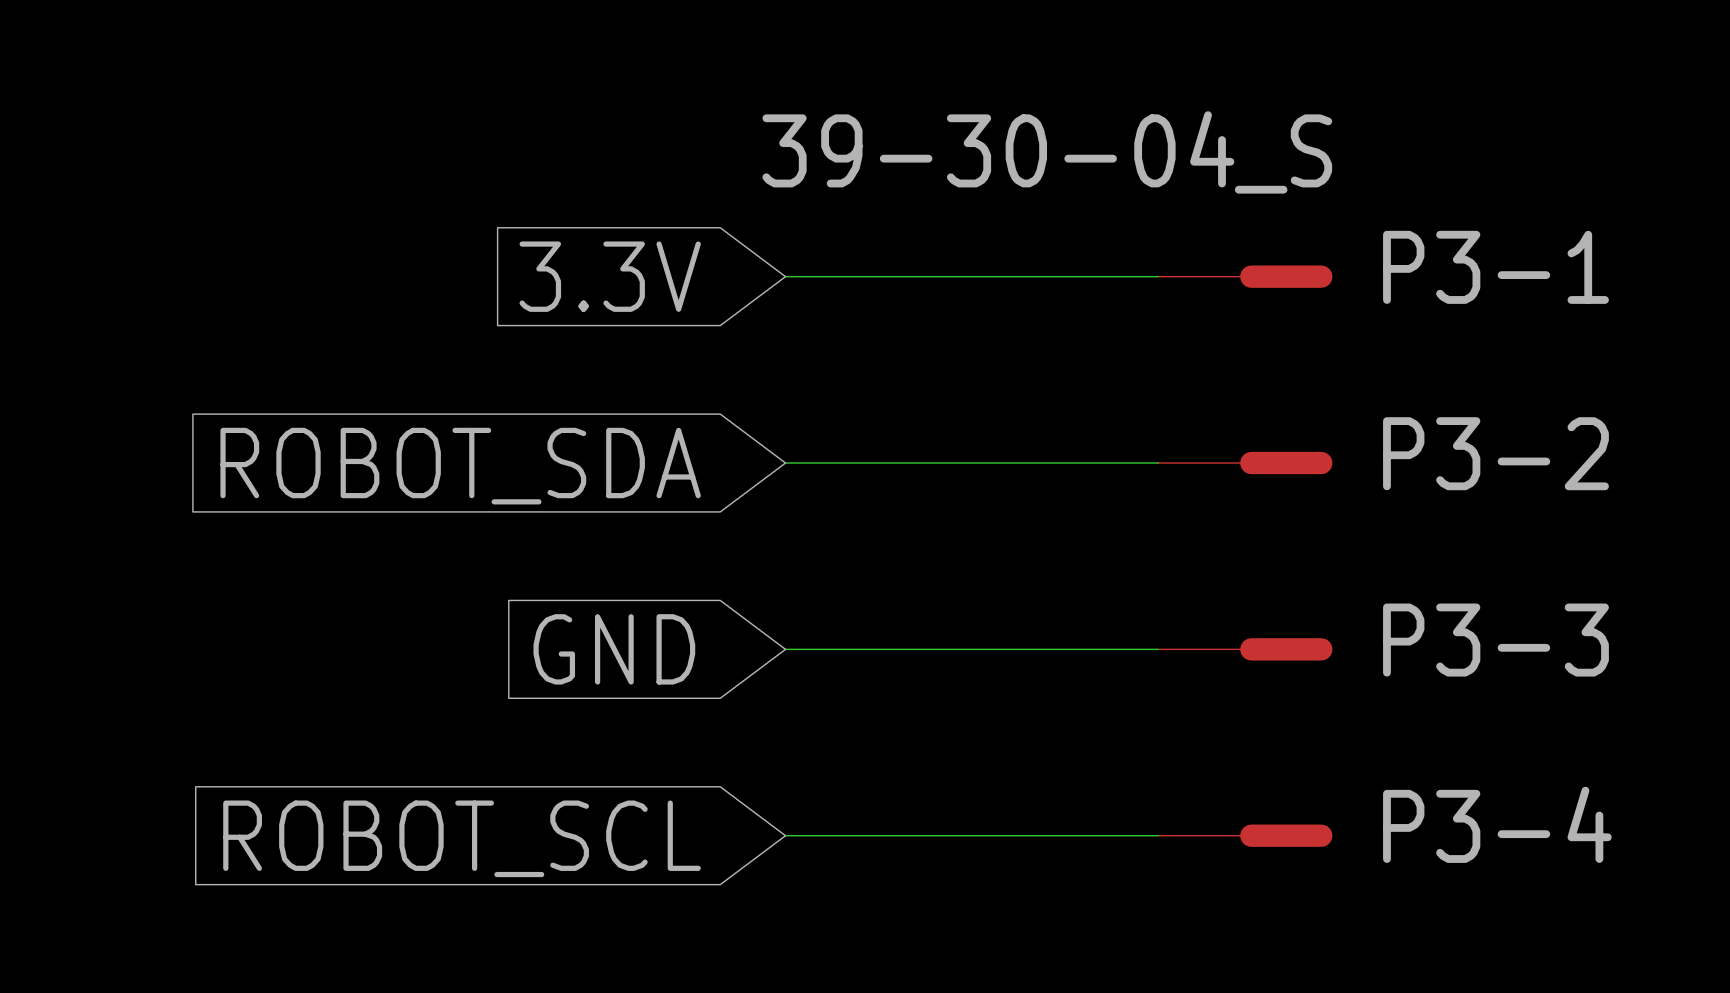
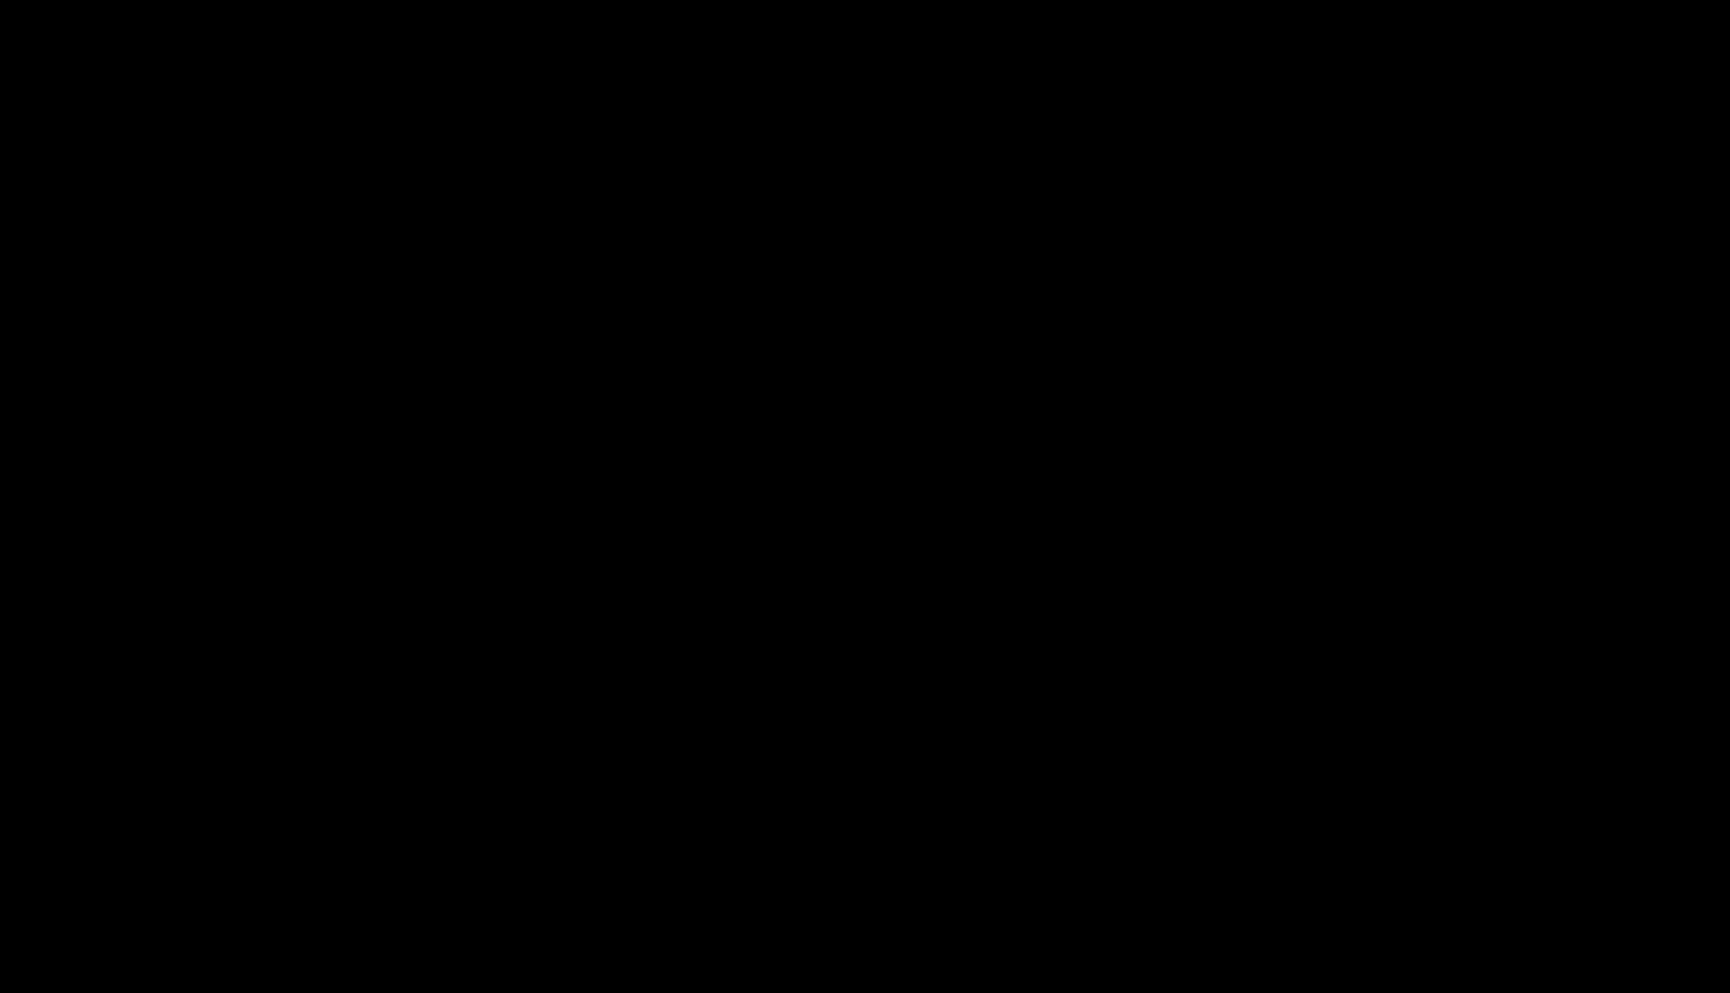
global label: 3.3V (610, 276) -> none
wire: (785, 276) (1158, 276) -> none
P3-1: 39-30-04_S (1245, 276) -> none
wire: (785, 463) (1158, 463) -> none
P3-2: (1245, 463) -> none
global label: ROBOT_SDA (460, 466) -> none
global label: GND (614, 649) -> none
wire: (785, 649) (1158, 649) -> none
P3-3: (1245, 649) -> none
wire: (785, 835) (1158, 835) -> none
P3-4: (1245, 835) -> none
global label: ROBOT_SCL (462, 838) -> none

